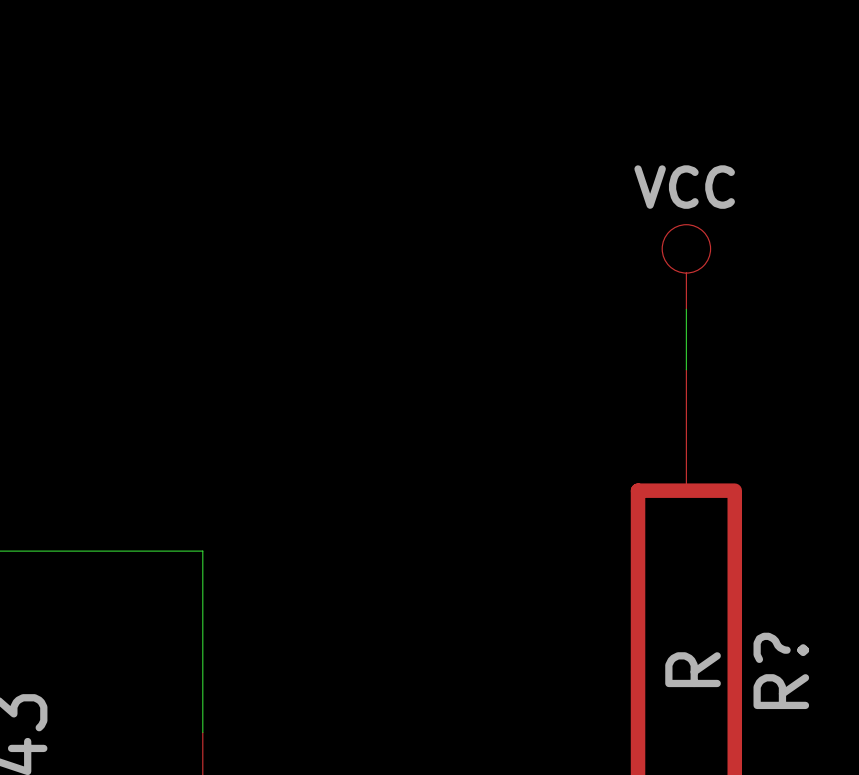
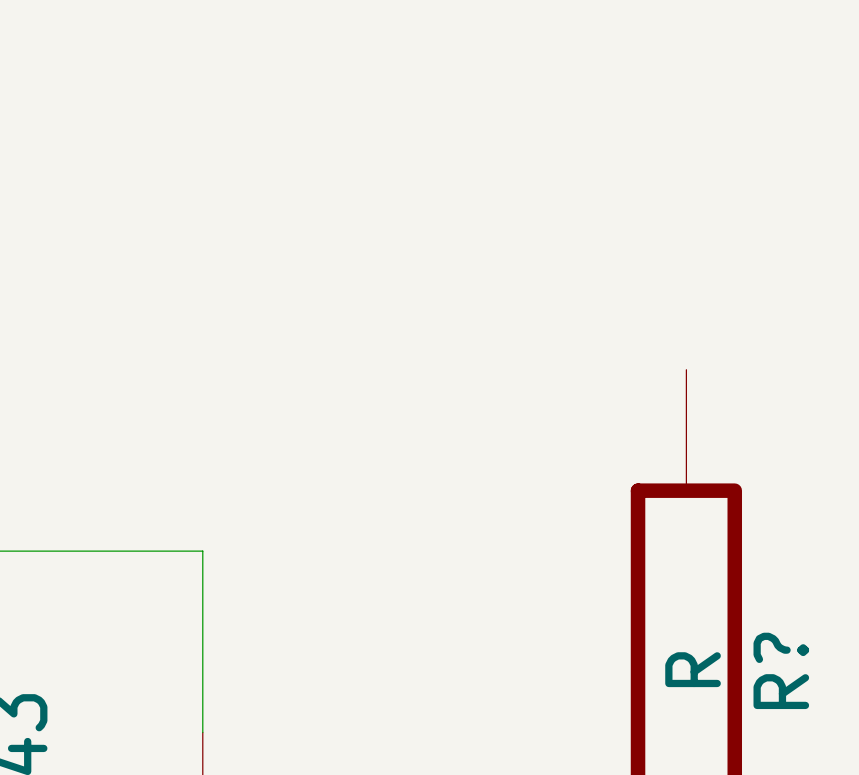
power symbol: VCC (686, 267) -> none
wire: (686, 309) (686, 369) -> none

